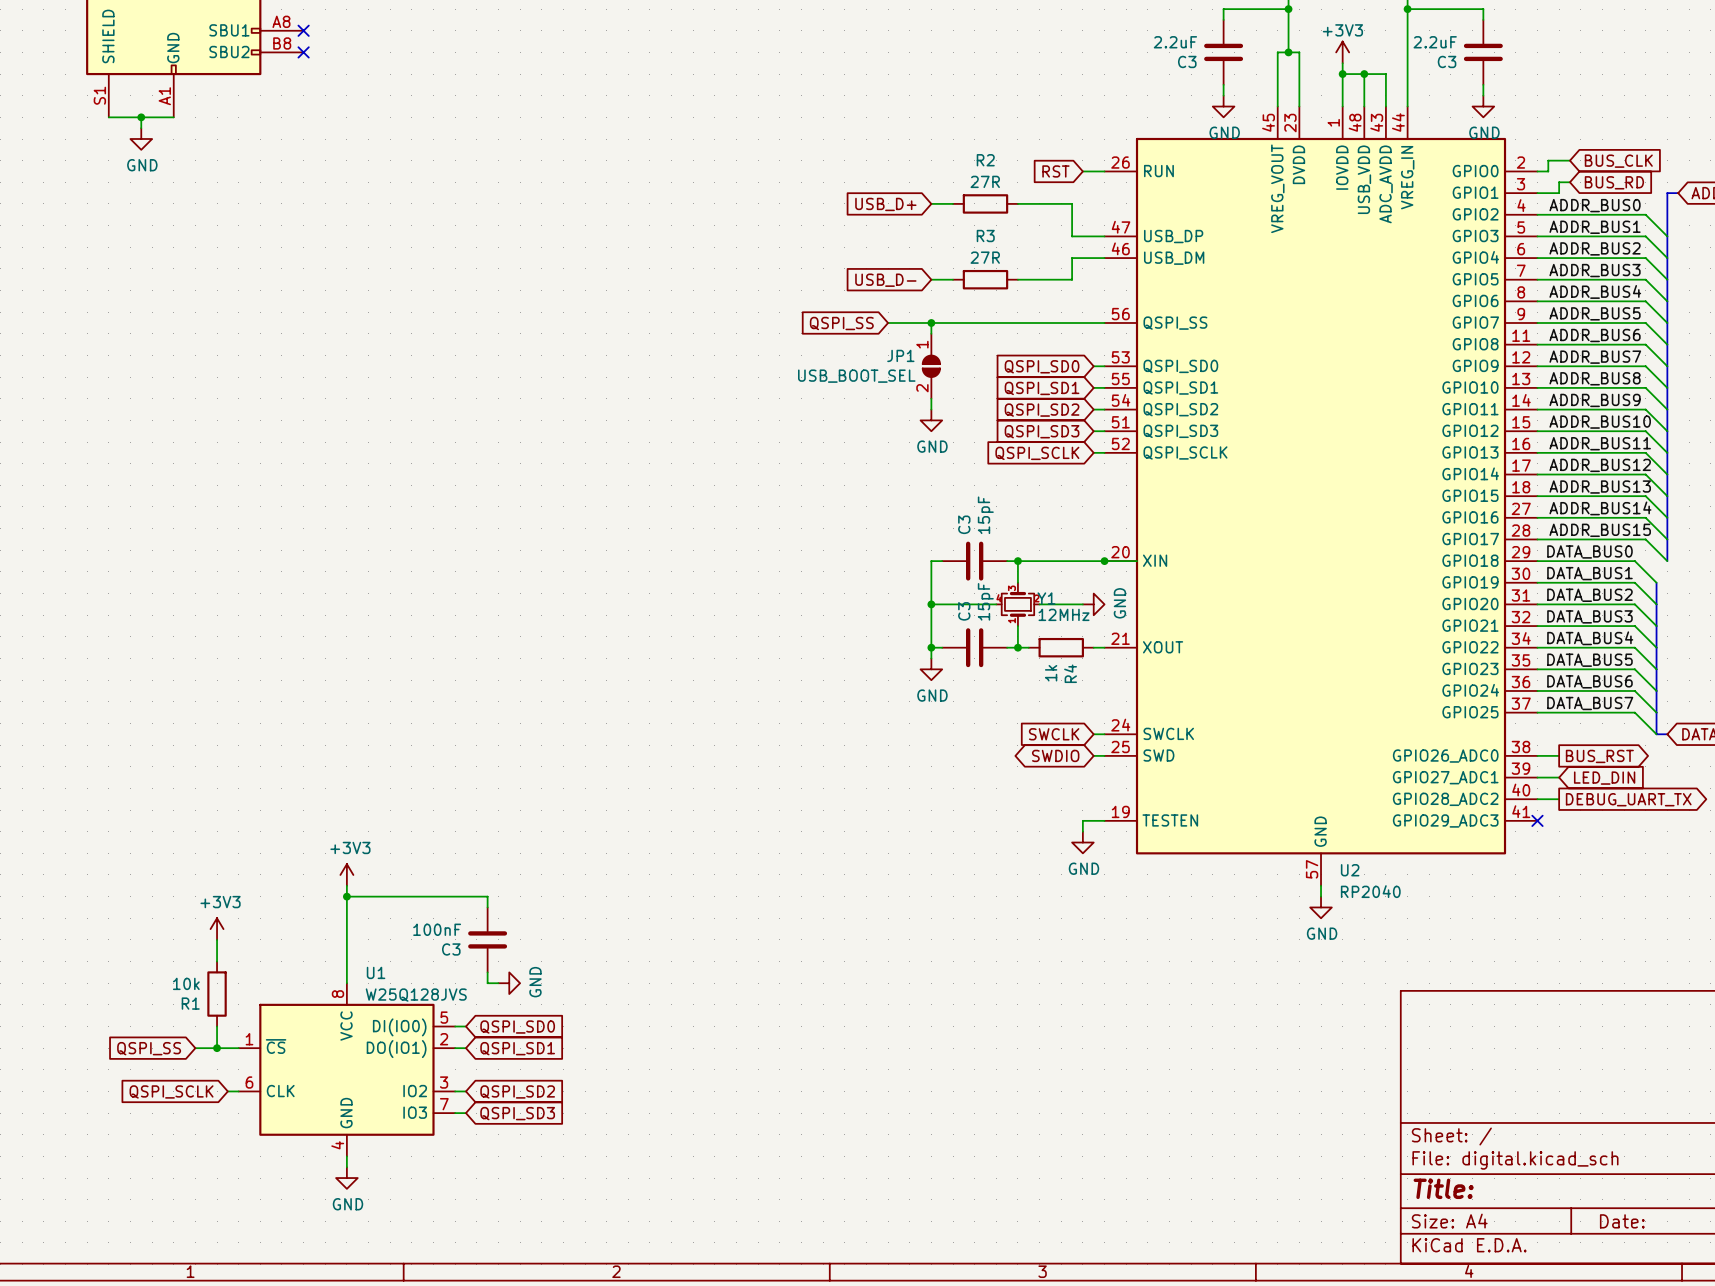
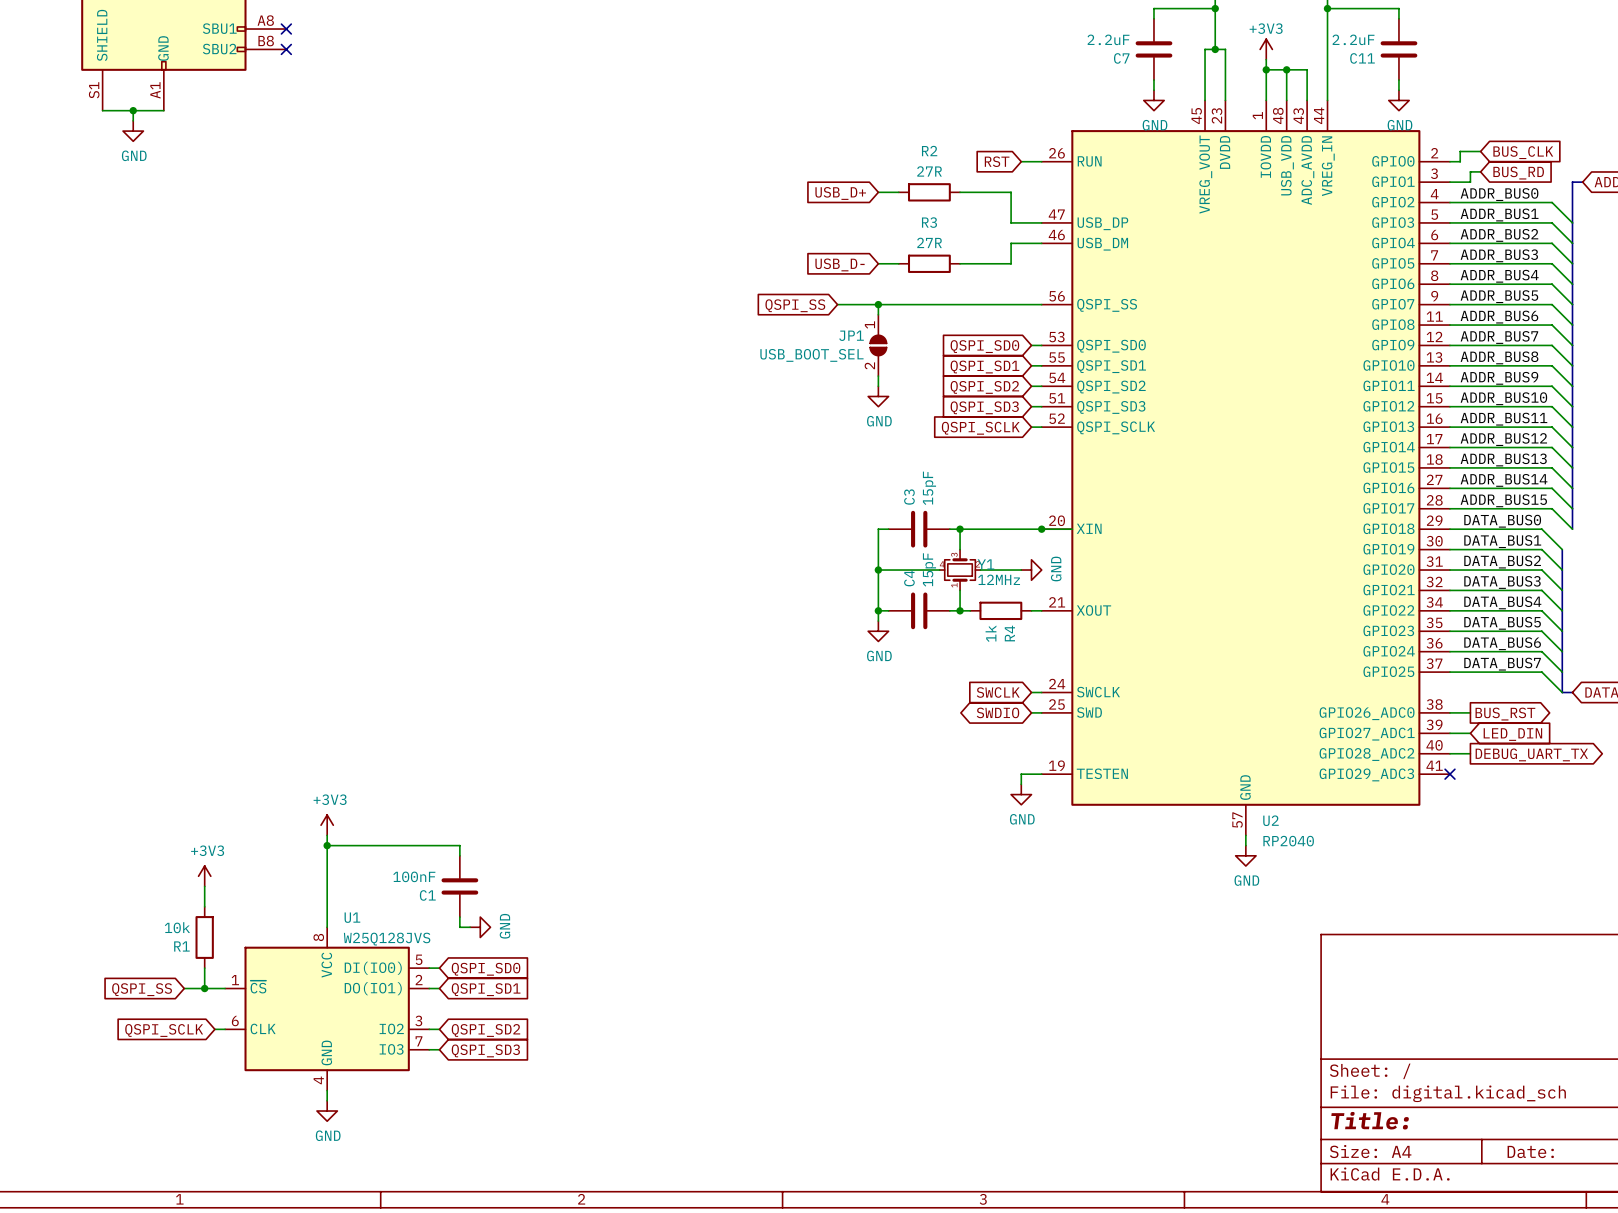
C3 name: C3 (1187, 61) -> C7 (1121, 58)
C3 name: C3 (1447, 61) -> C11 (1362, 58)
C3 name: C3 (964, 611) -> C4 (909, 578)
C3 name: C3 (451, 949) -> C1 (427, 895)

